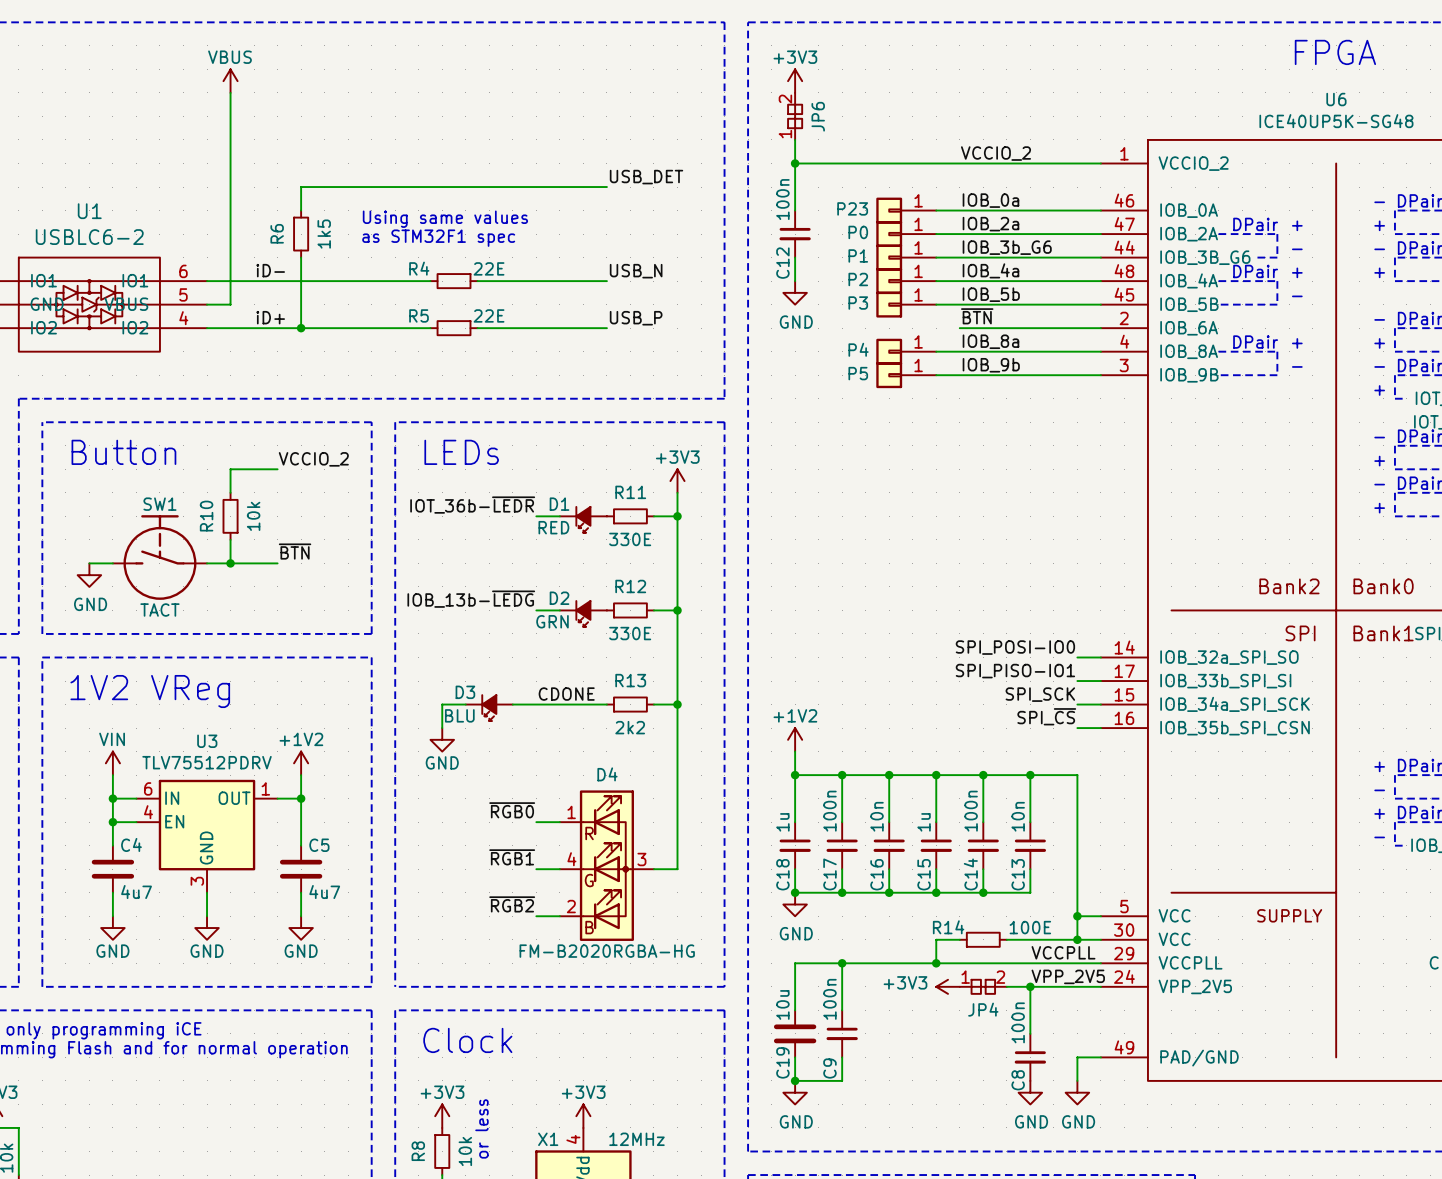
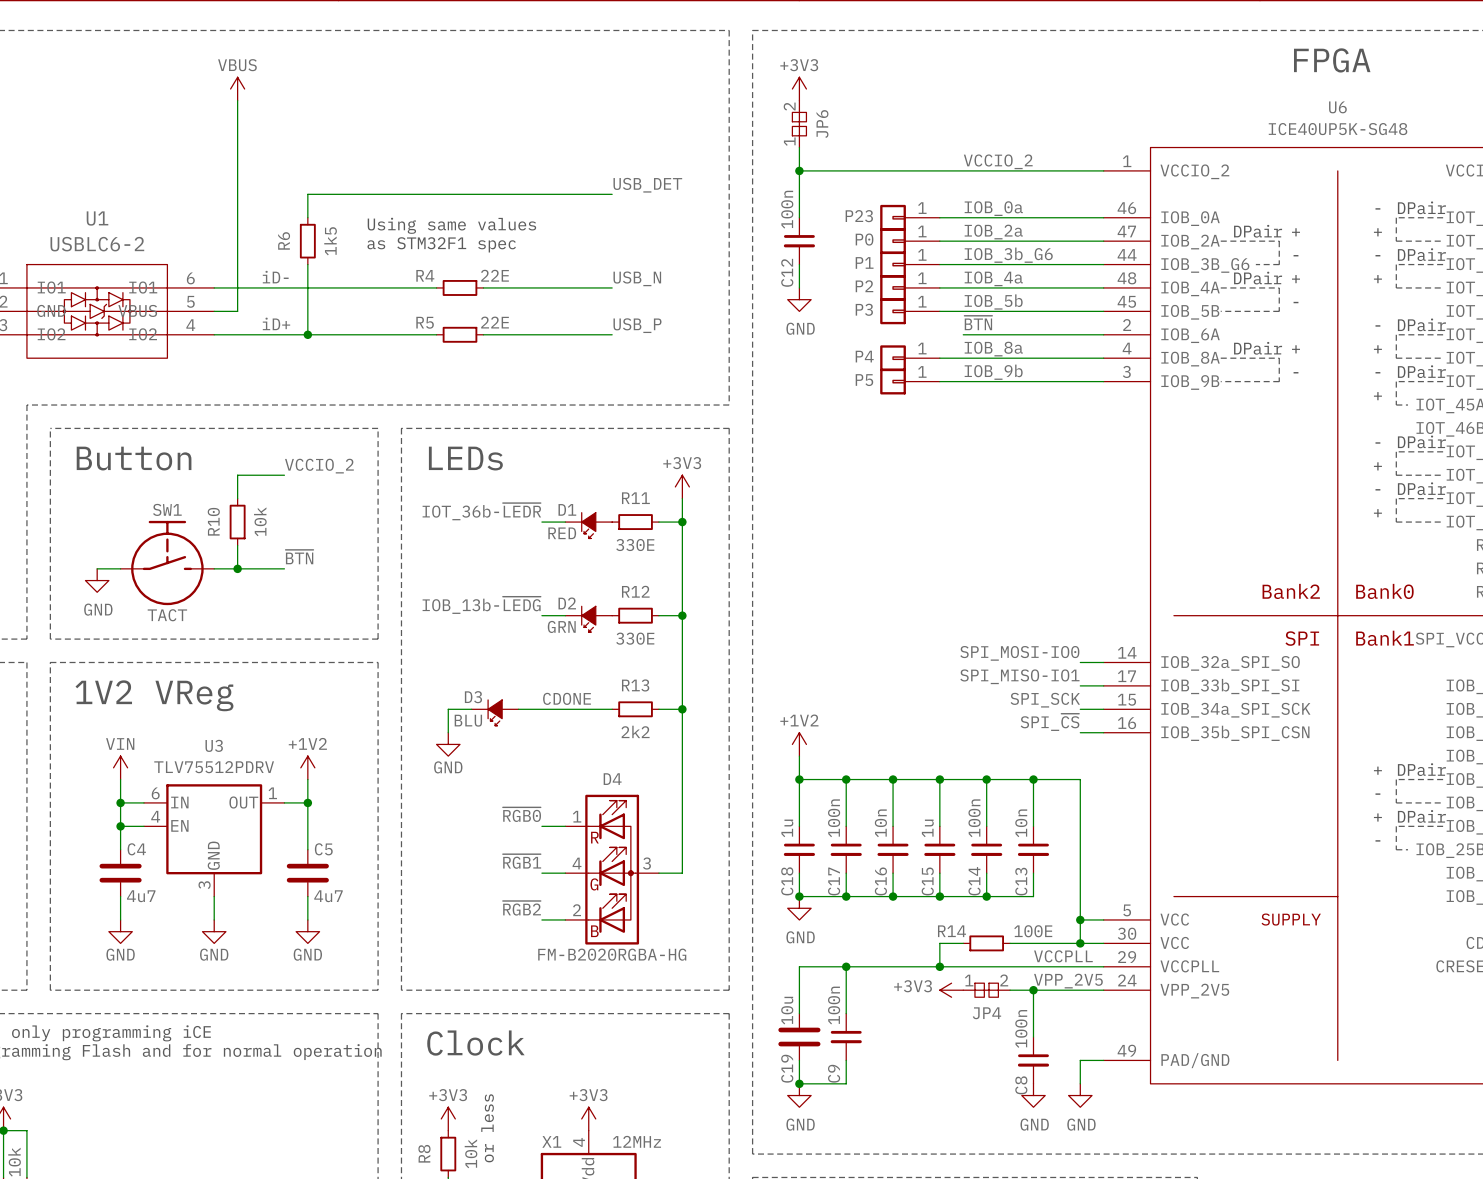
SW1 flip: as is (159, 557) -> left-right (167, 563)
label: SPI_POSI-IO0 (1015, 647) -> SPI_MOSI-IO0 (1019, 653)
label: SPI_PISO-IO1 (1015, 671) -> SPI_MISO-IO1 (1019, 676)

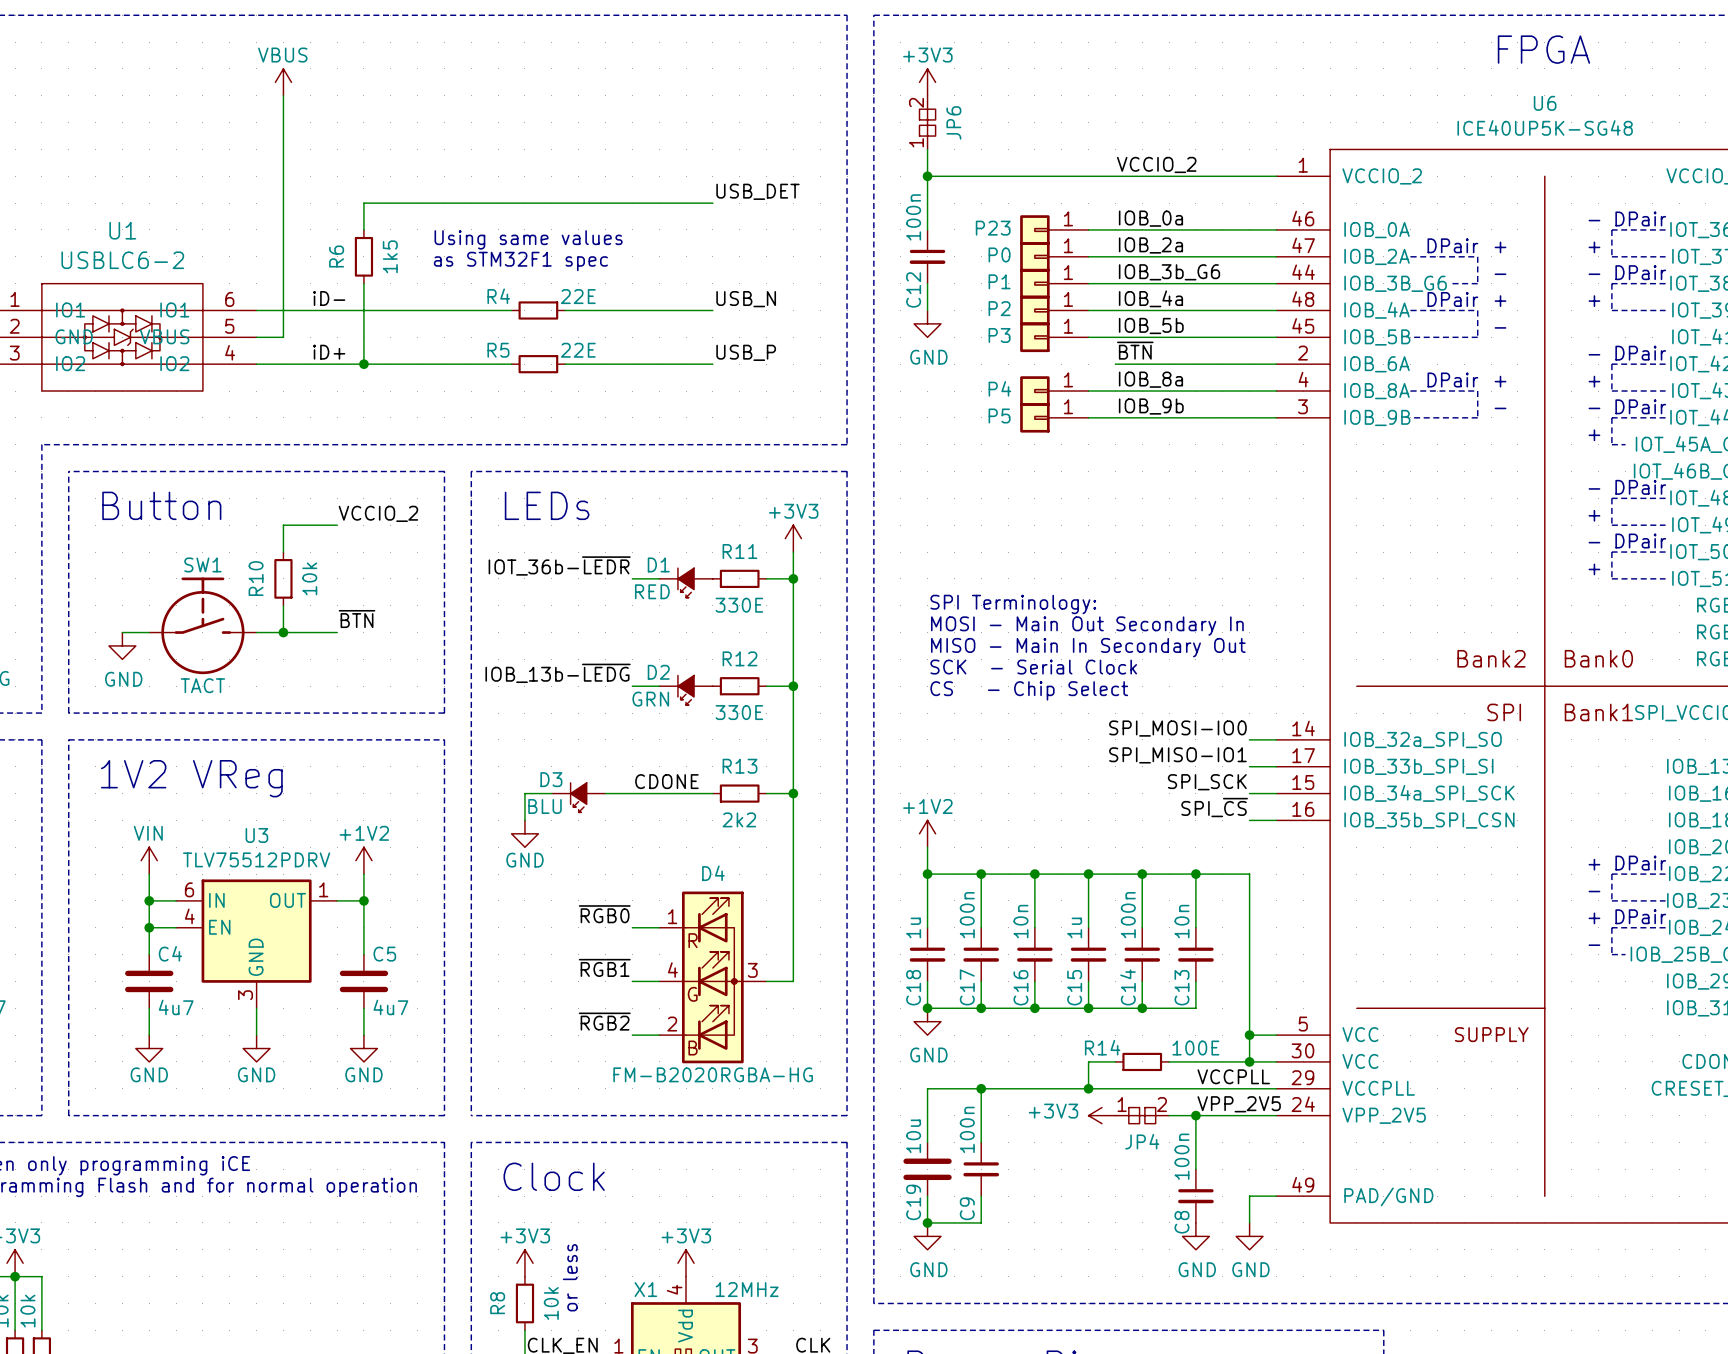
text: none -> SPI Terminology: (1013, 604)
text: none -> MOSI - Main Out Secondary In (1087, 626)
text: none -> MISO - Main In Secondary Out (1088, 647)
text: none -> SCK - Serial Clock (1033, 667)
text: none -> CS - Chip Select (1029, 690)

